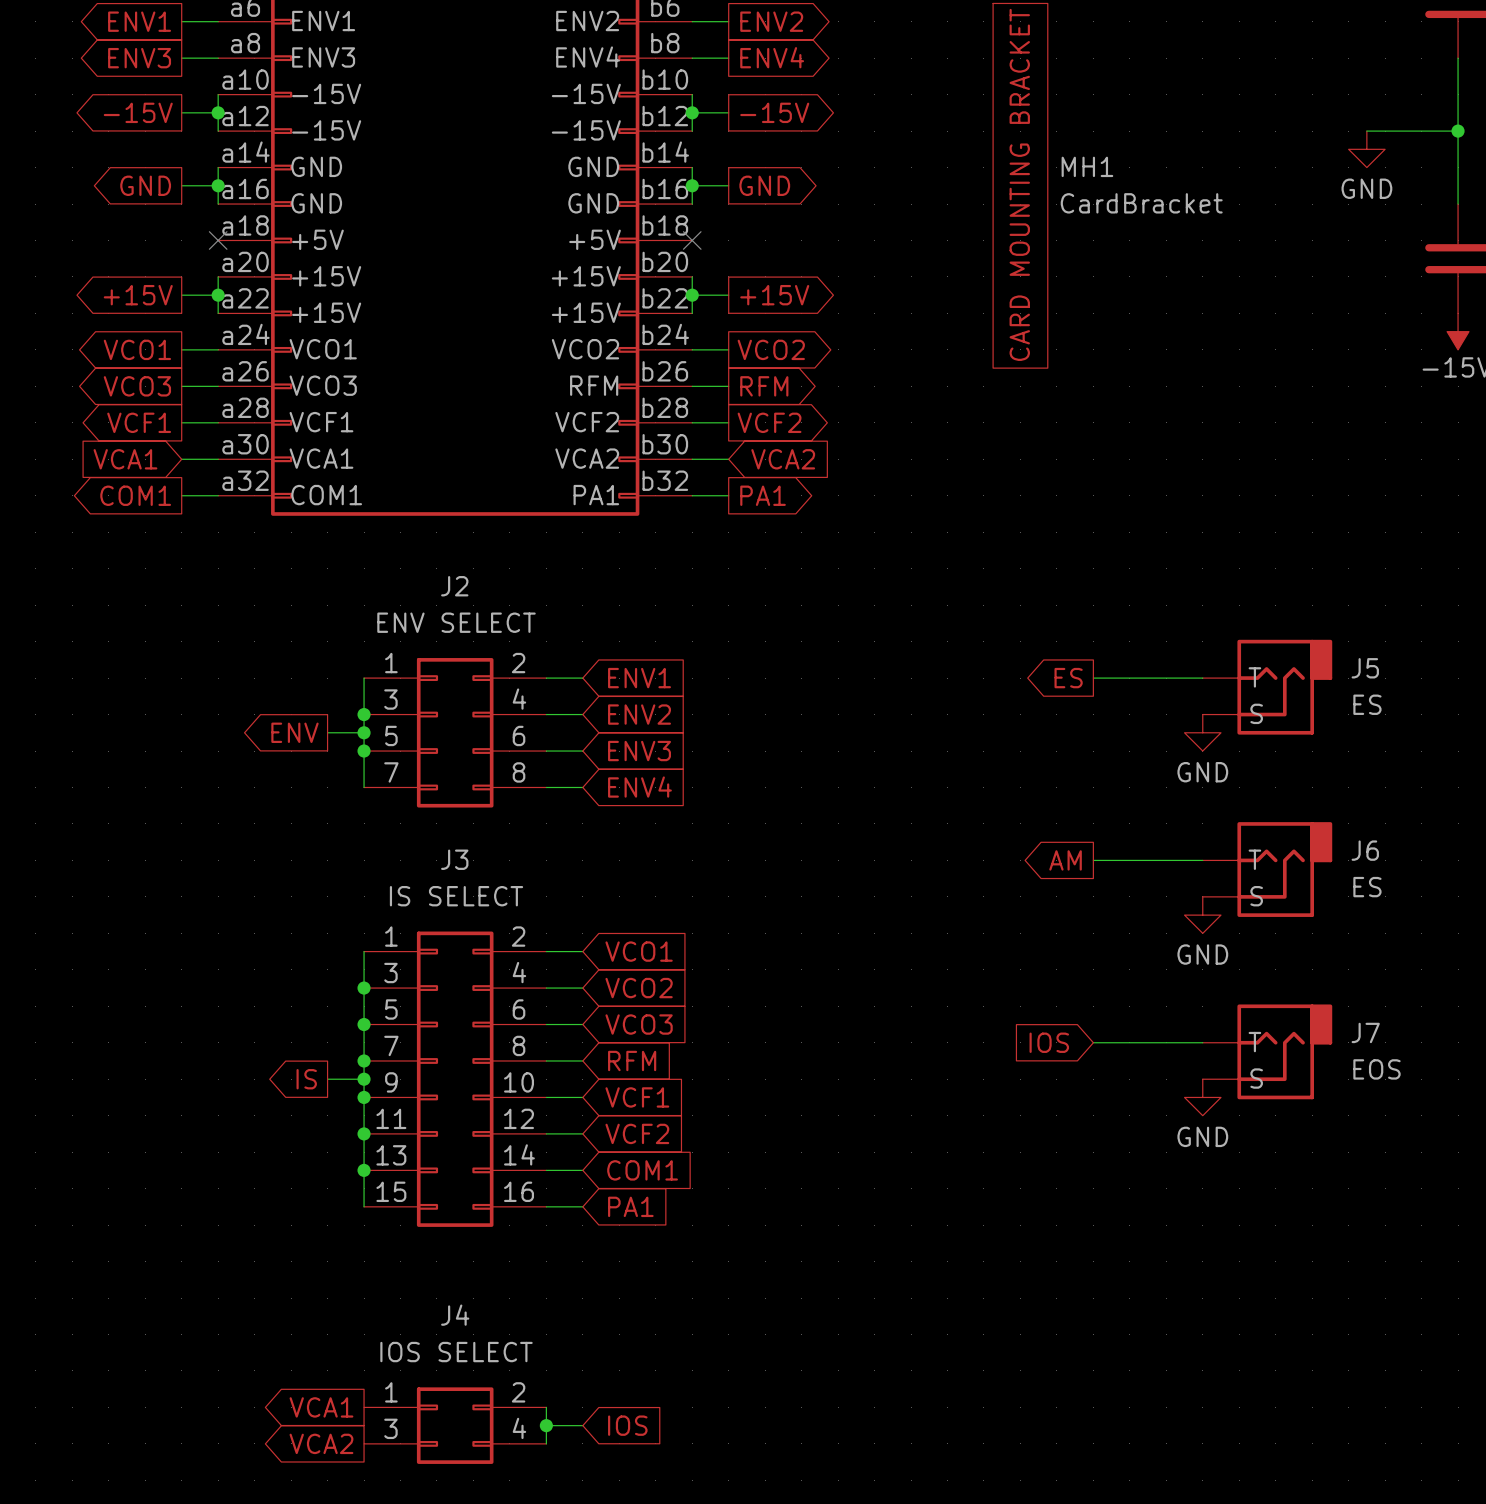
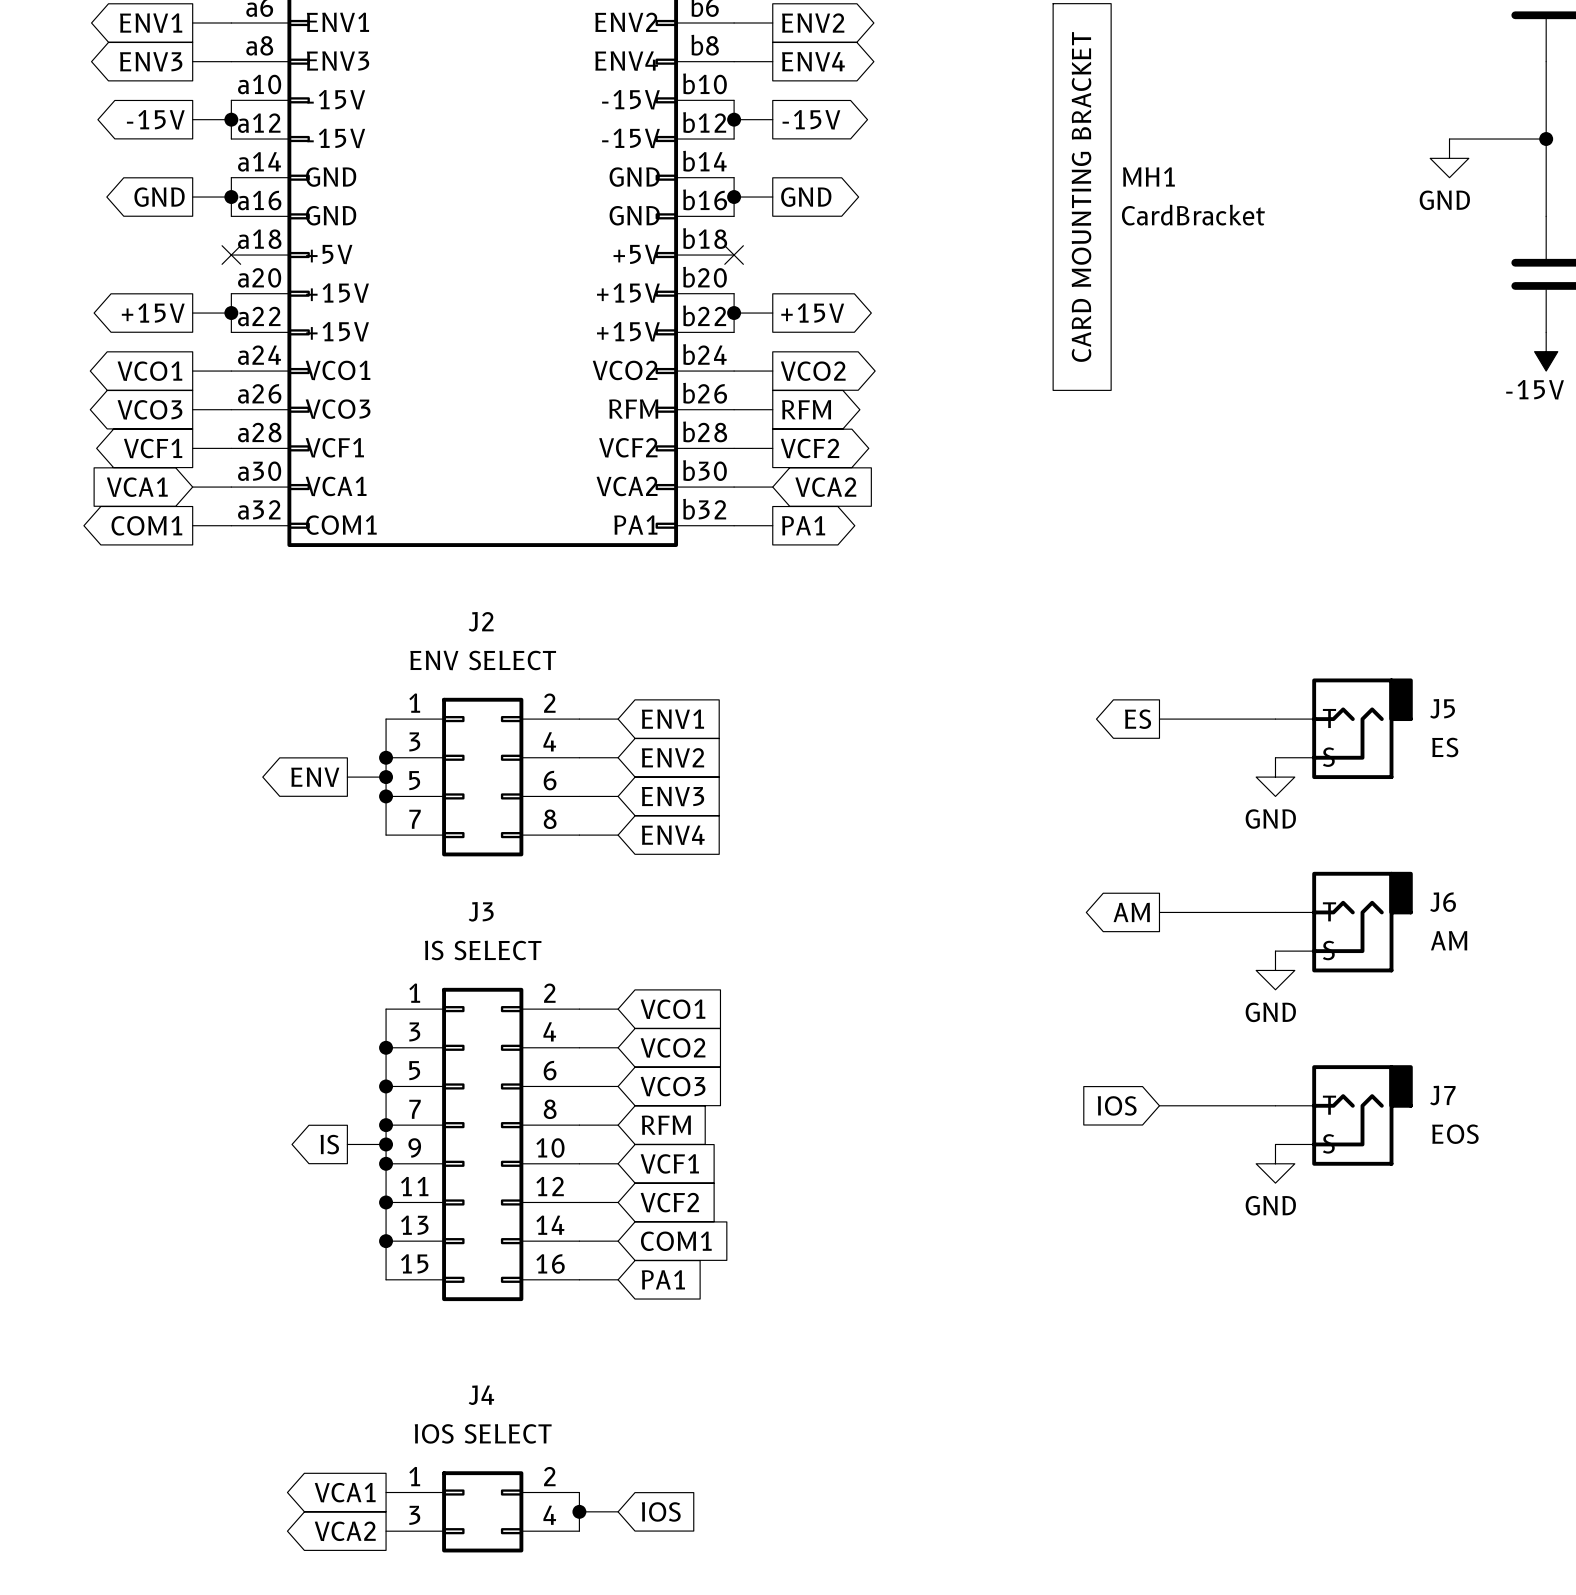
J6 value: ES (1367, 887) -> AM (1449, 940)

